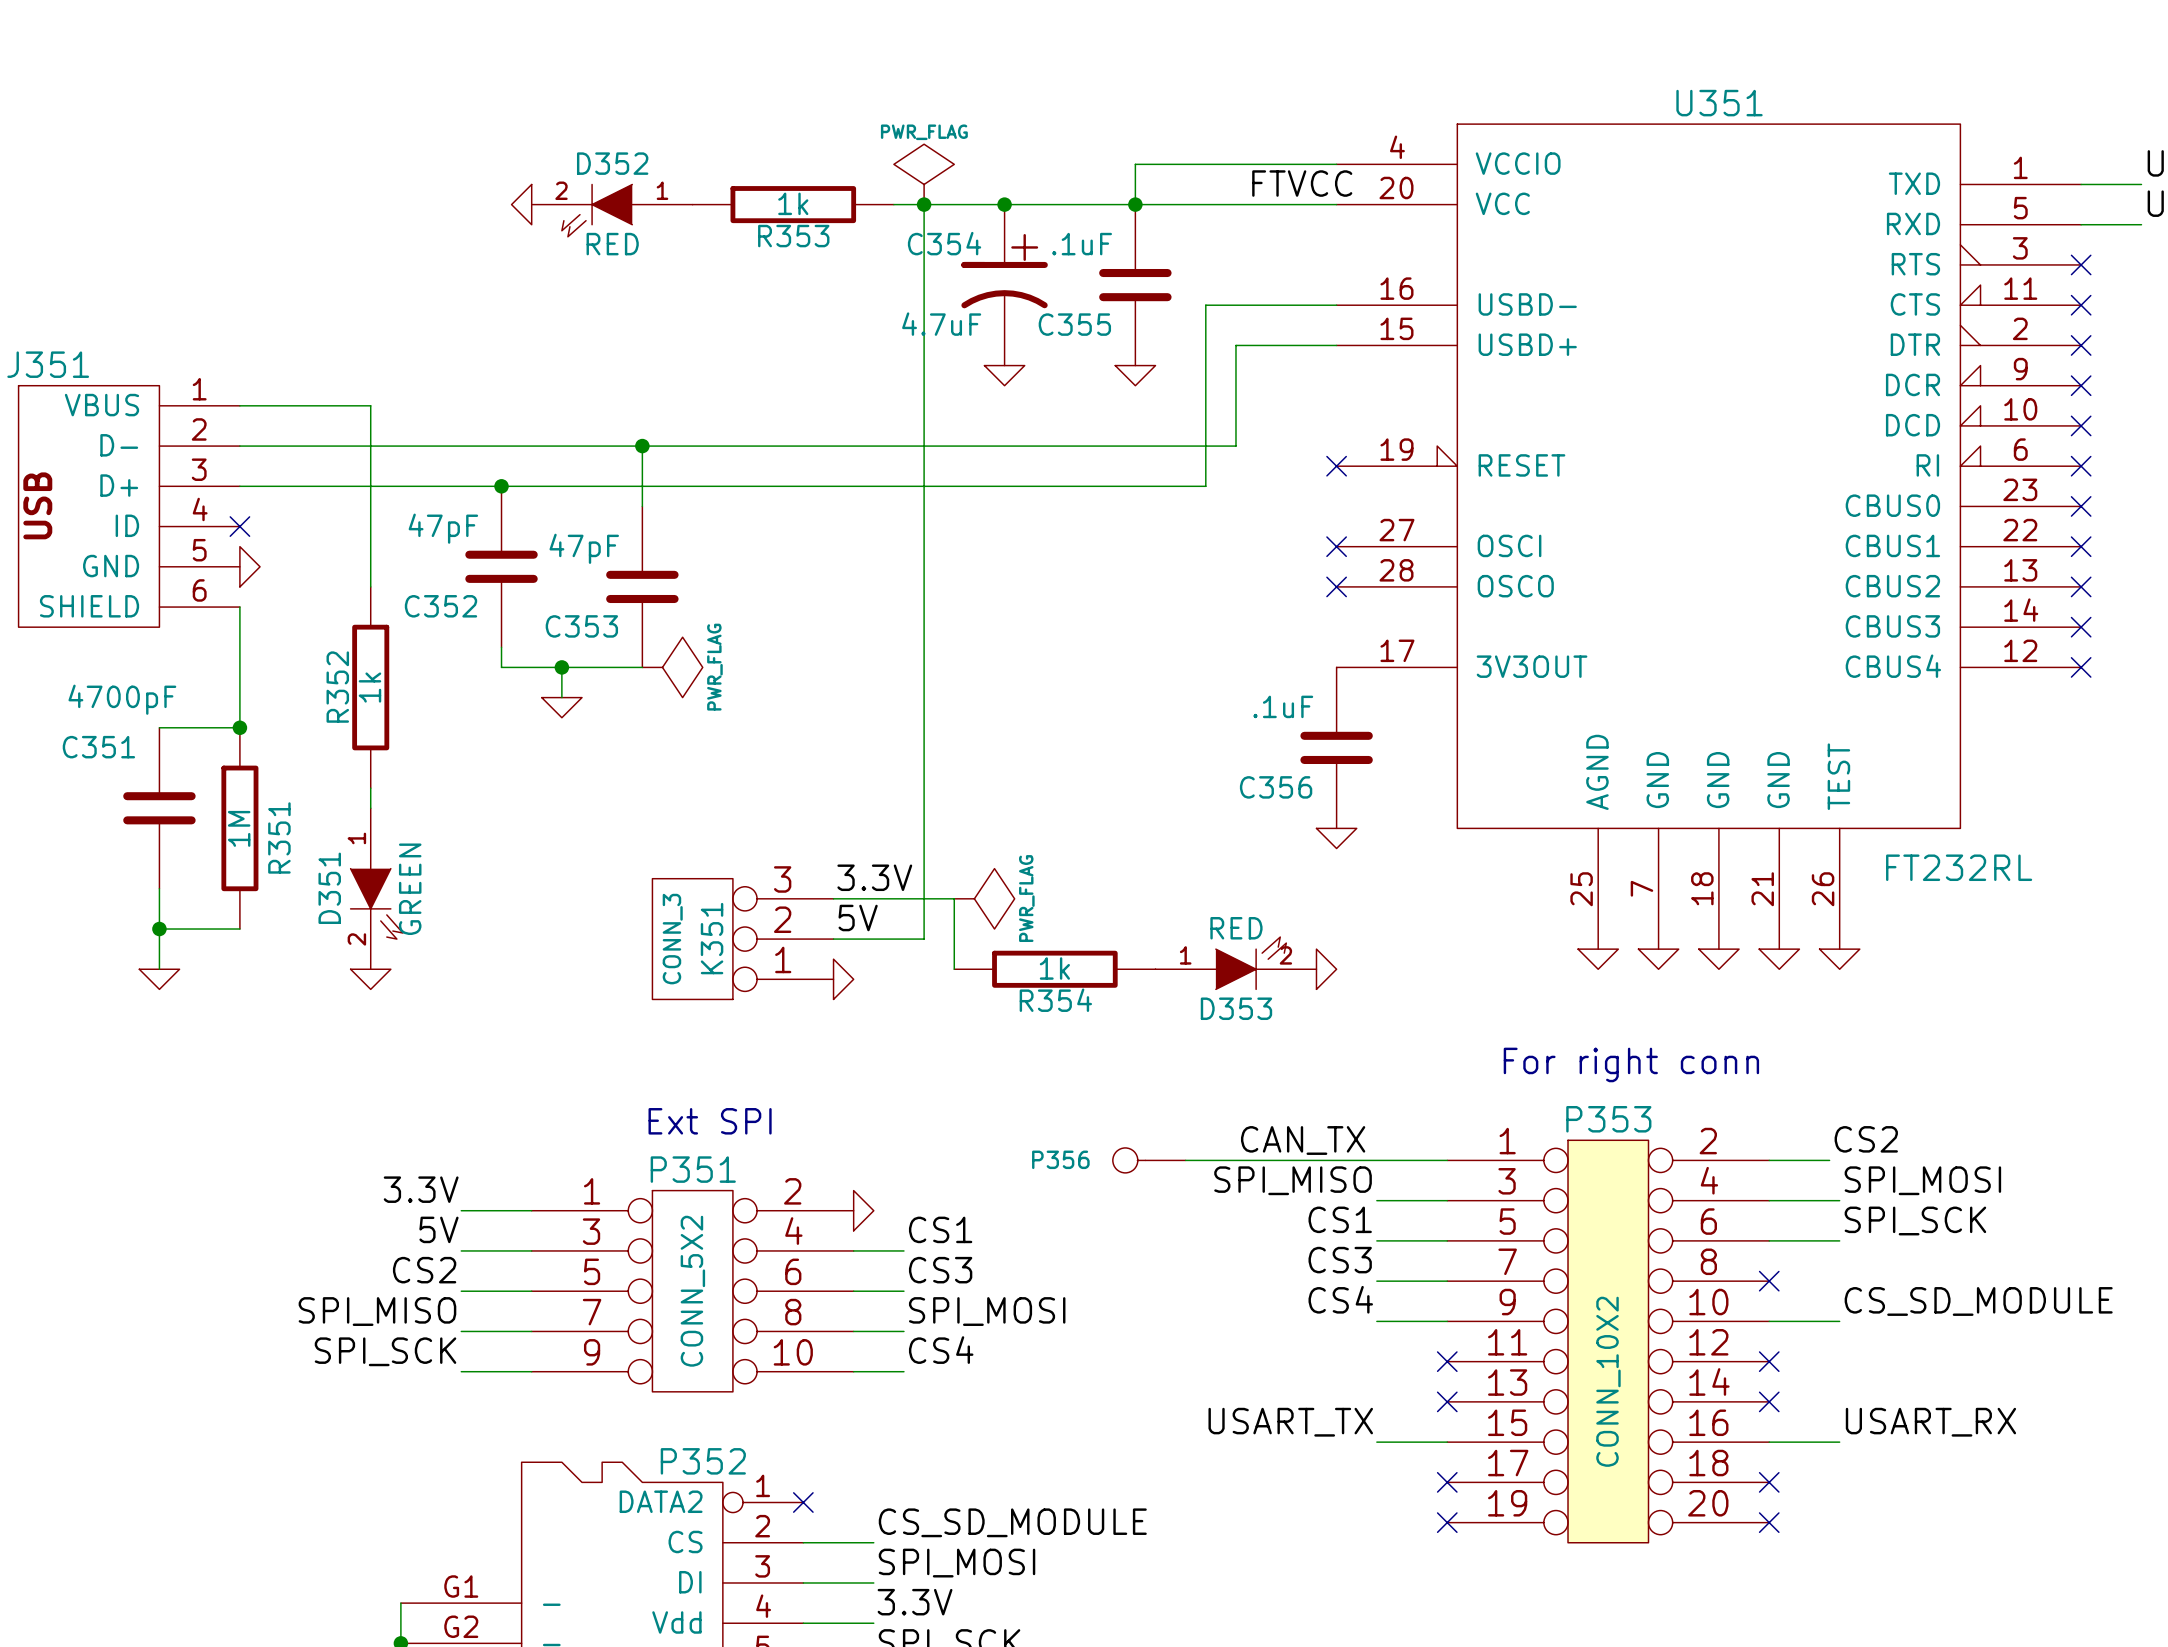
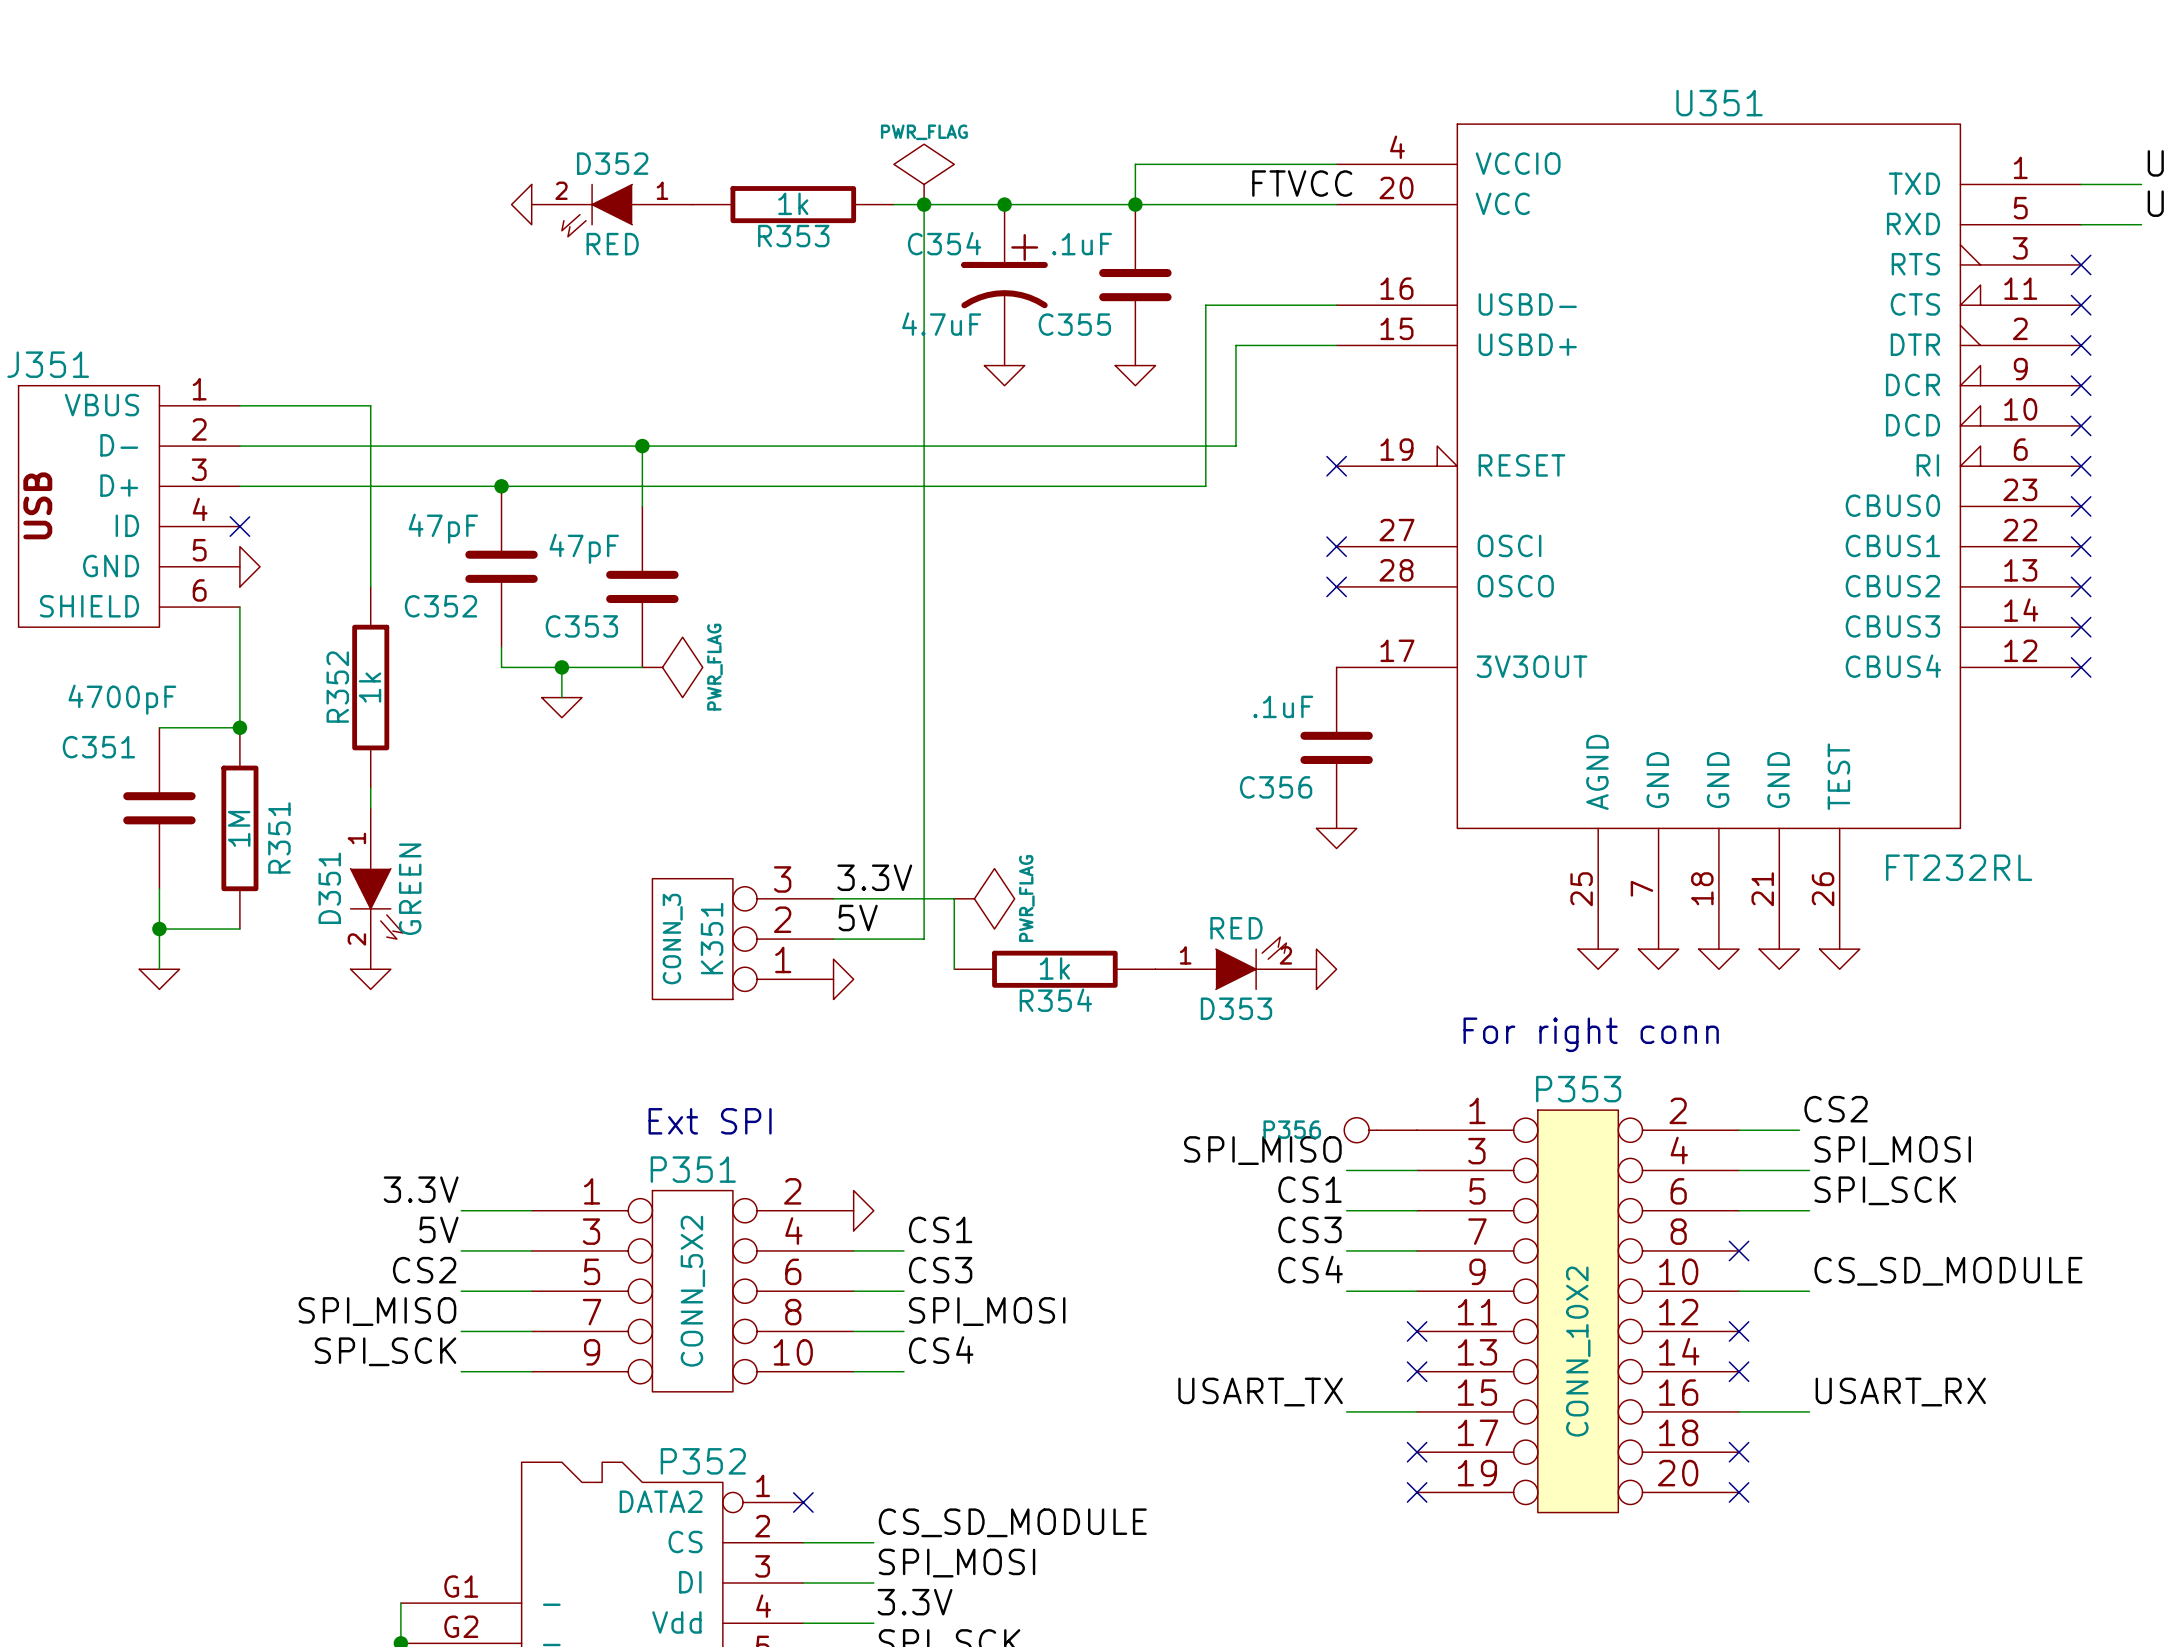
text position: For right conn (1631, 1064) -> For right conn (1591, 1034)
label position: CS2 (1866, 1139) -> CS2 (1836, 1109)
label: CAN_TX (1303, 1140) -> none
P356 position: (1149, 1160) -> (1380, 1130)
wire: (1185, 1160) (1447, 1160) -> none
wire: (1769, 1160) (1829, 1160) -> (1739, 1130) (1799, 1130)
label position: SPI_MISO (1293, 1180) -> SPI_MISO (1262, 1150)
label position: SPI_MOSI (1922, 1180) -> SPI_MOSI (1892, 1150)
wire: (1376, 1200) (1447, 1200) -> (1346, 1170) (1417, 1170)
wire: (1769, 1200) (1839, 1200) -> (1739, 1170) (1809, 1170)
label position: CS1 (1340, 1219) -> CS1 (1310, 1189)
label position: SPI_SCK (1915, 1220) -> SPI_SCK (1885, 1190)
wire: (1376, 1240) (1447, 1240) -> (1346, 1210) (1417, 1210)
wire: (1769, 1240) (1839, 1240) -> (1739, 1210) (1809, 1210)
no-connect mark: none -> (1739, 1250)
label position: CS3 (1340, 1260) -> CS3 (1310, 1229)
wire: (1376, 1281) (1447, 1281) -> (1346, 1250) (1417, 1250)
no-connect mark: (1769, 1281) -> none
label position: CS4 (1340, 1299) -> CS4 (1310, 1269)
label position: CS_SD_MODULE (1978, 1301) -> CS_SD_MODULE (1948, 1271)
wire: (1376, 1321) (1447, 1321) -> (1346, 1291) (1417, 1291)
wire: (1769, 1321) (1839, 1321) -> (1739, 1291) (1809, 1291)
no-connect mark: none -> (1417, 1331)
no-connect mark: none -> (1739, 1331)
P353 position: (1608, 1341) -> (1578, 1311)
no-connect mark: (1447, 1361) -> none
no-connect mark: (1769, 1361) -> none
no-connect mark: none -> (1417, 1371)
no-connect mark: none -> (1739, 1371)
no-connect mark: (1447, 1401) -> none
no-connect mark: (1769, 1401) -> none
label position: USART_TX (1290, 1422) -> USART_TX (1260, 1392)
label position: USART_RX (1930, 1422) -> USART_RX (1900, 1392)
wire: (1376, 1442) (1447, 1442) -> (1346, 1411) (1417, 1411)
wire: (1769, 1442) (1839, 1442) -> (1739, 1411) (1809, 1411)
no-connect mark: none -> (1417, 1452)
no-connect mark: none -> (1739, 1452)
no-connect mark: (1447, 1482) -> none
no-connect mark: (1769, 1482) -> none
no-connect mark: none -> (1417, 1492)
no-connect mark: none -> (1739, 1492)
no-connect mark: (1447, 1522) -> none
no-connect mark: (1769, 1522) -> none

